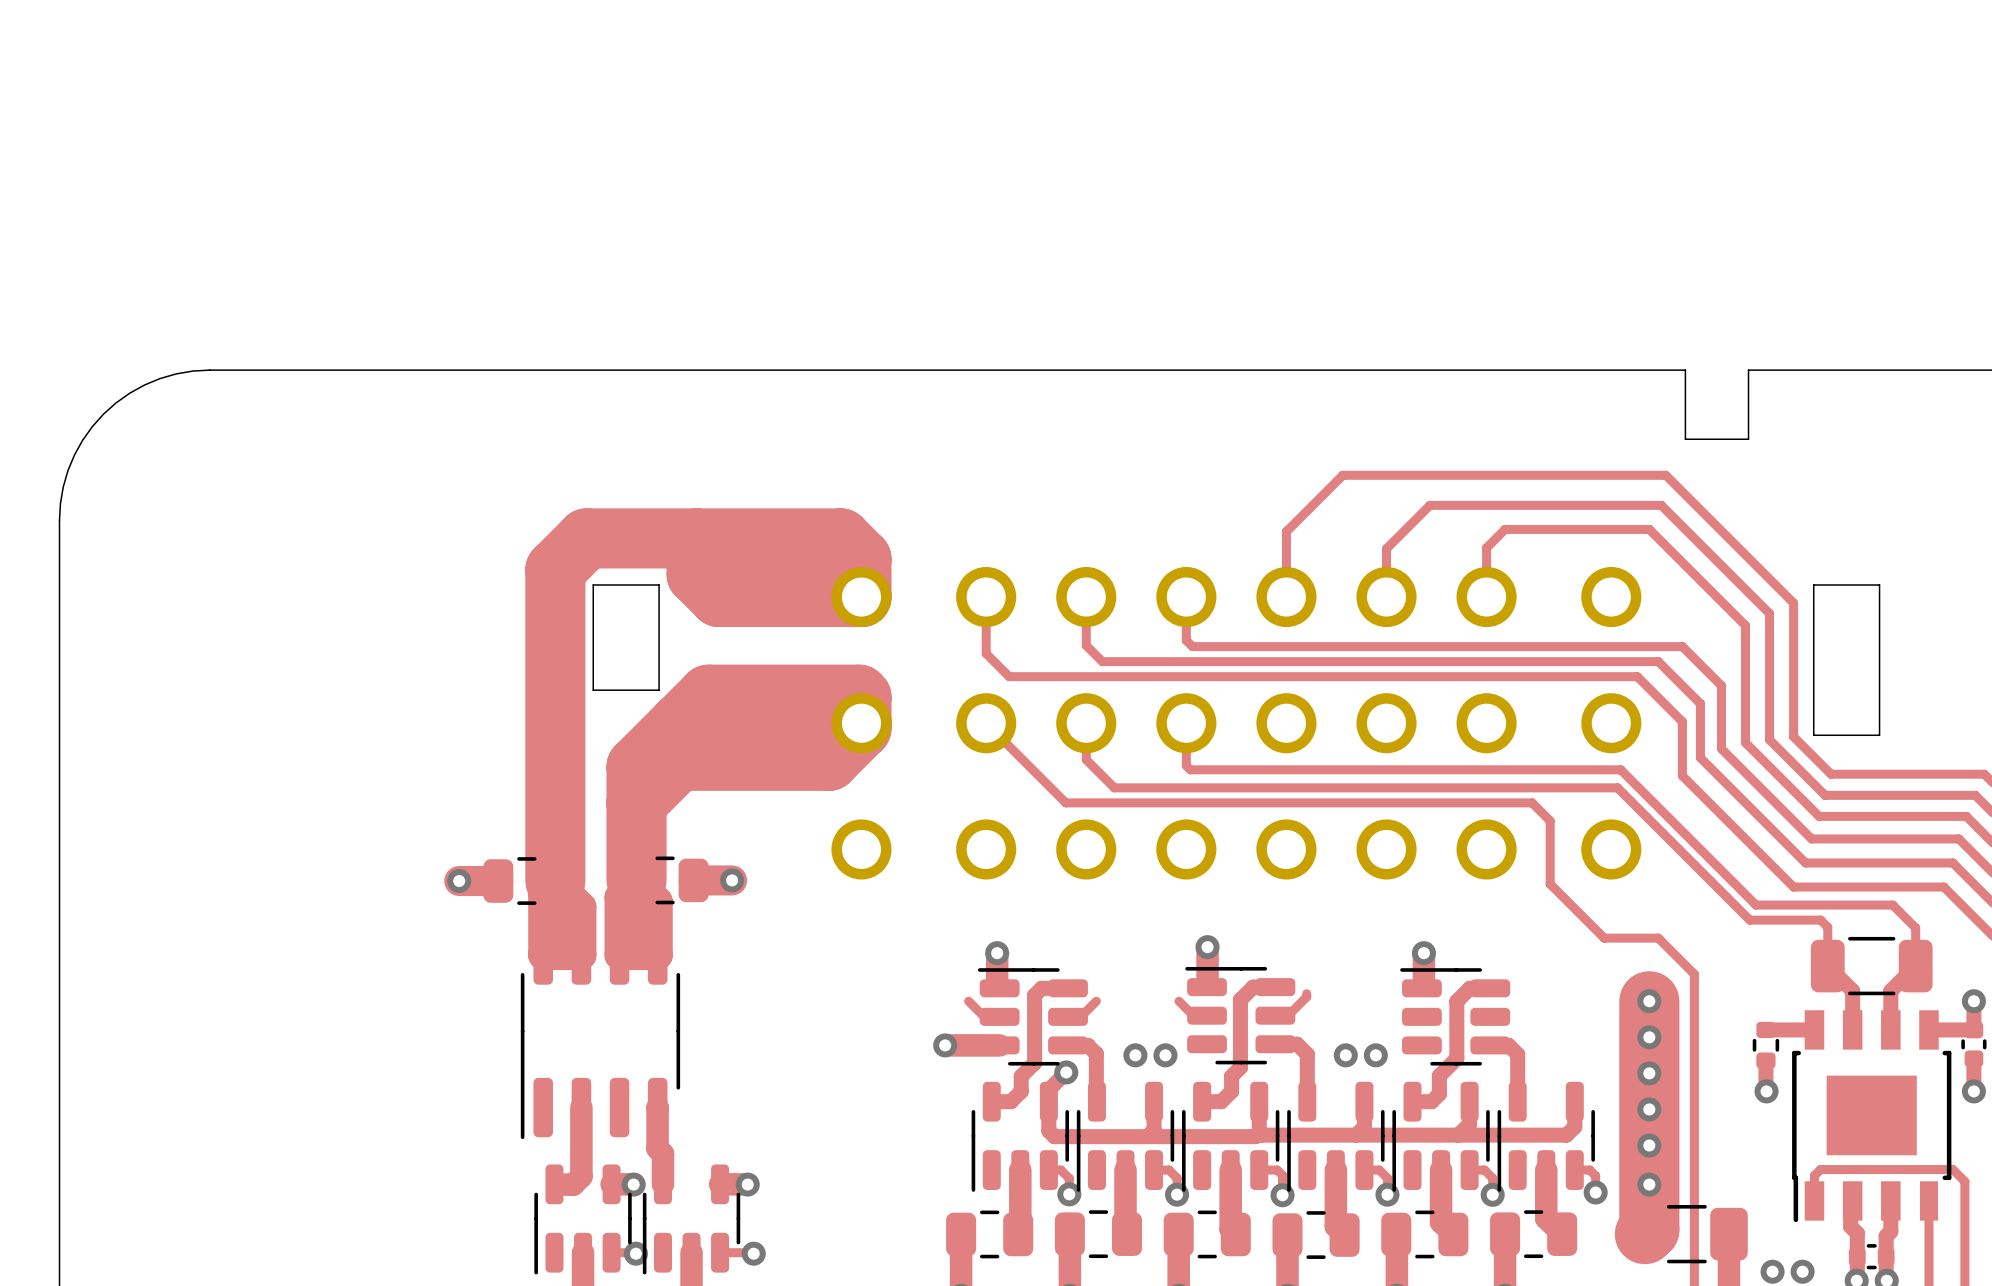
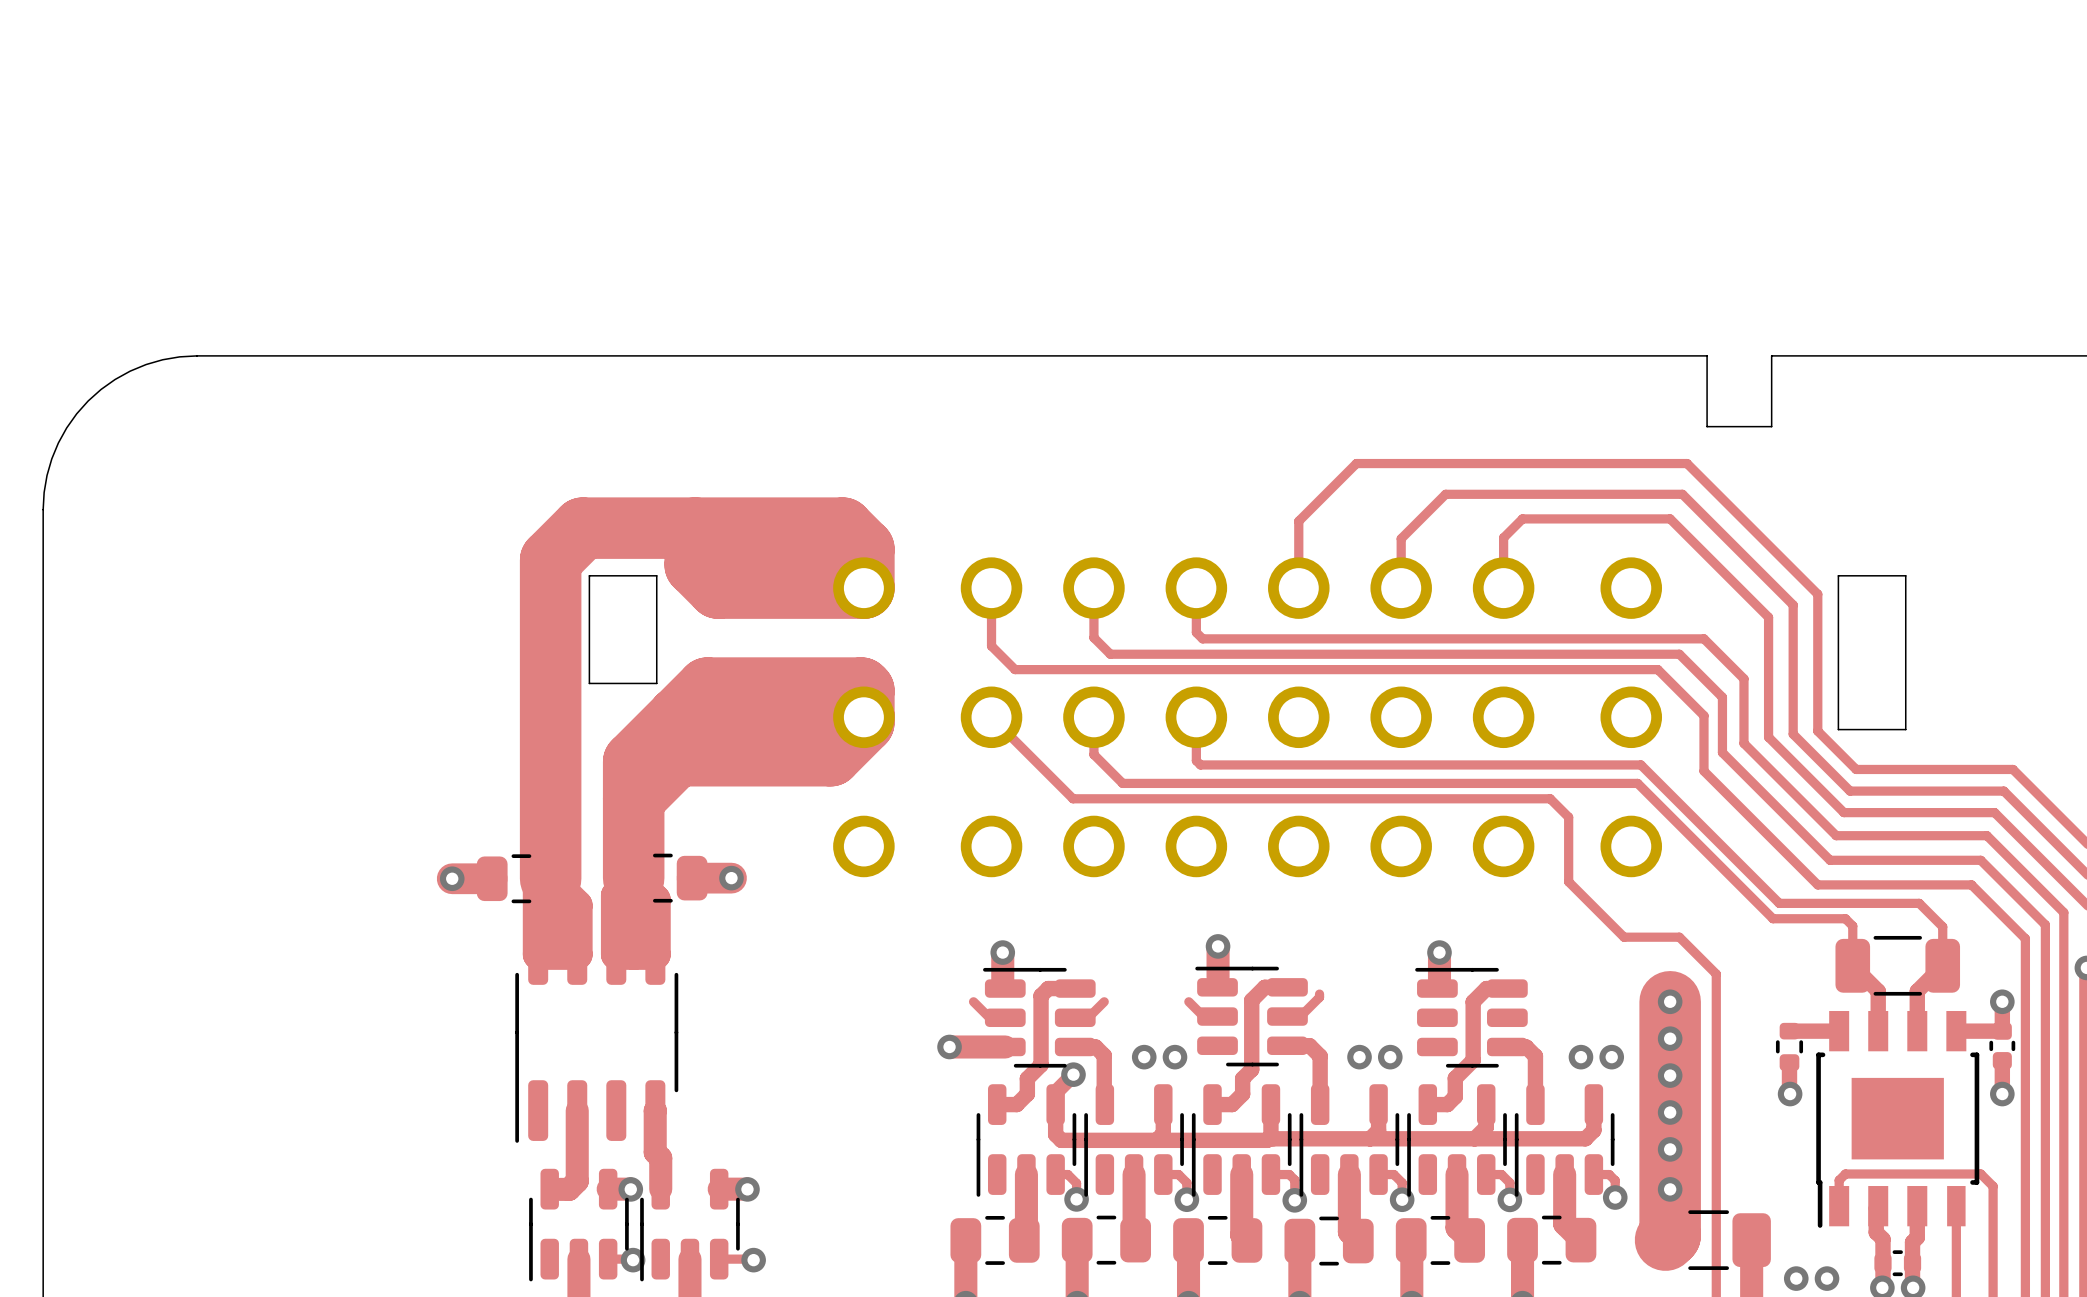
via: none -> (1580, 1057)
via: none -> (1611, 1057)

